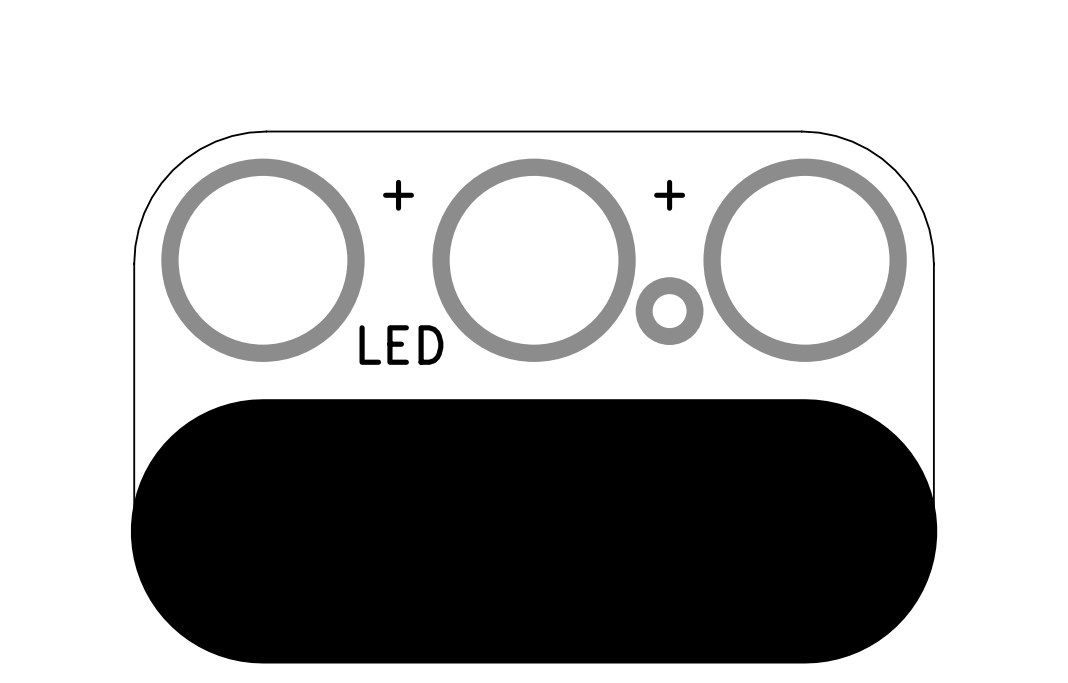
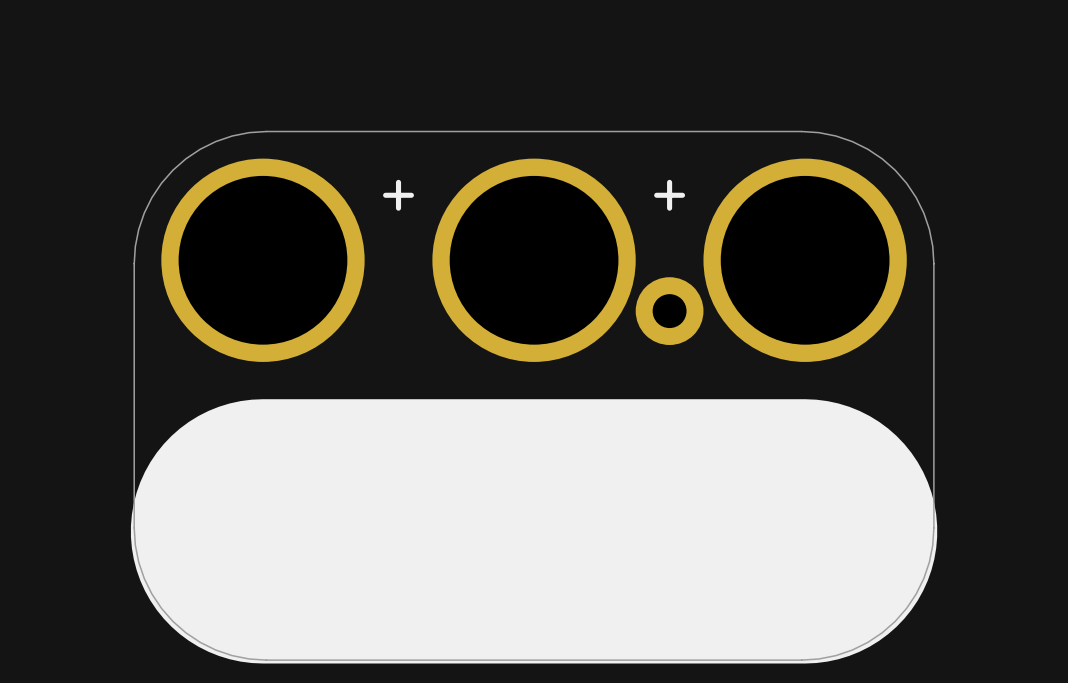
text: LED (401, 345) -> none

